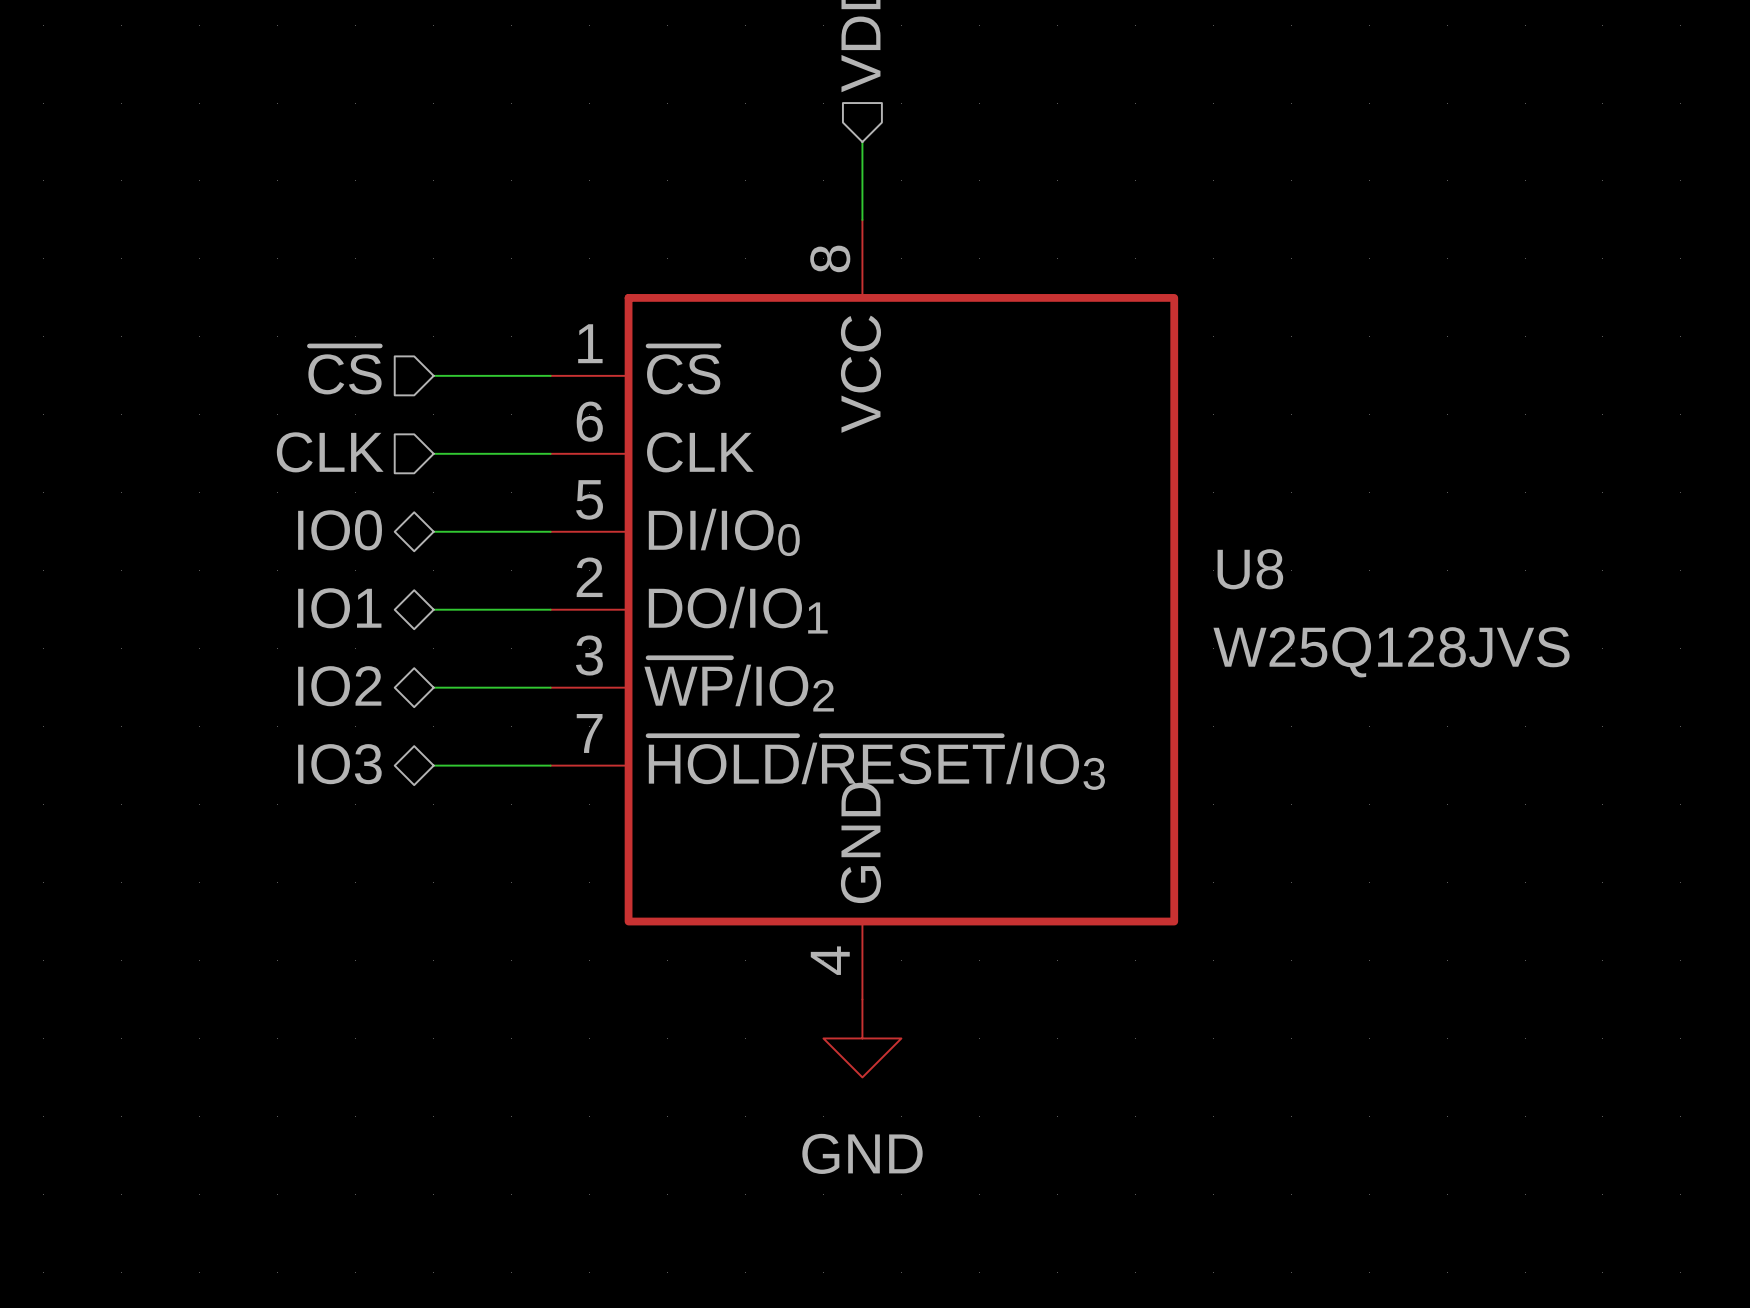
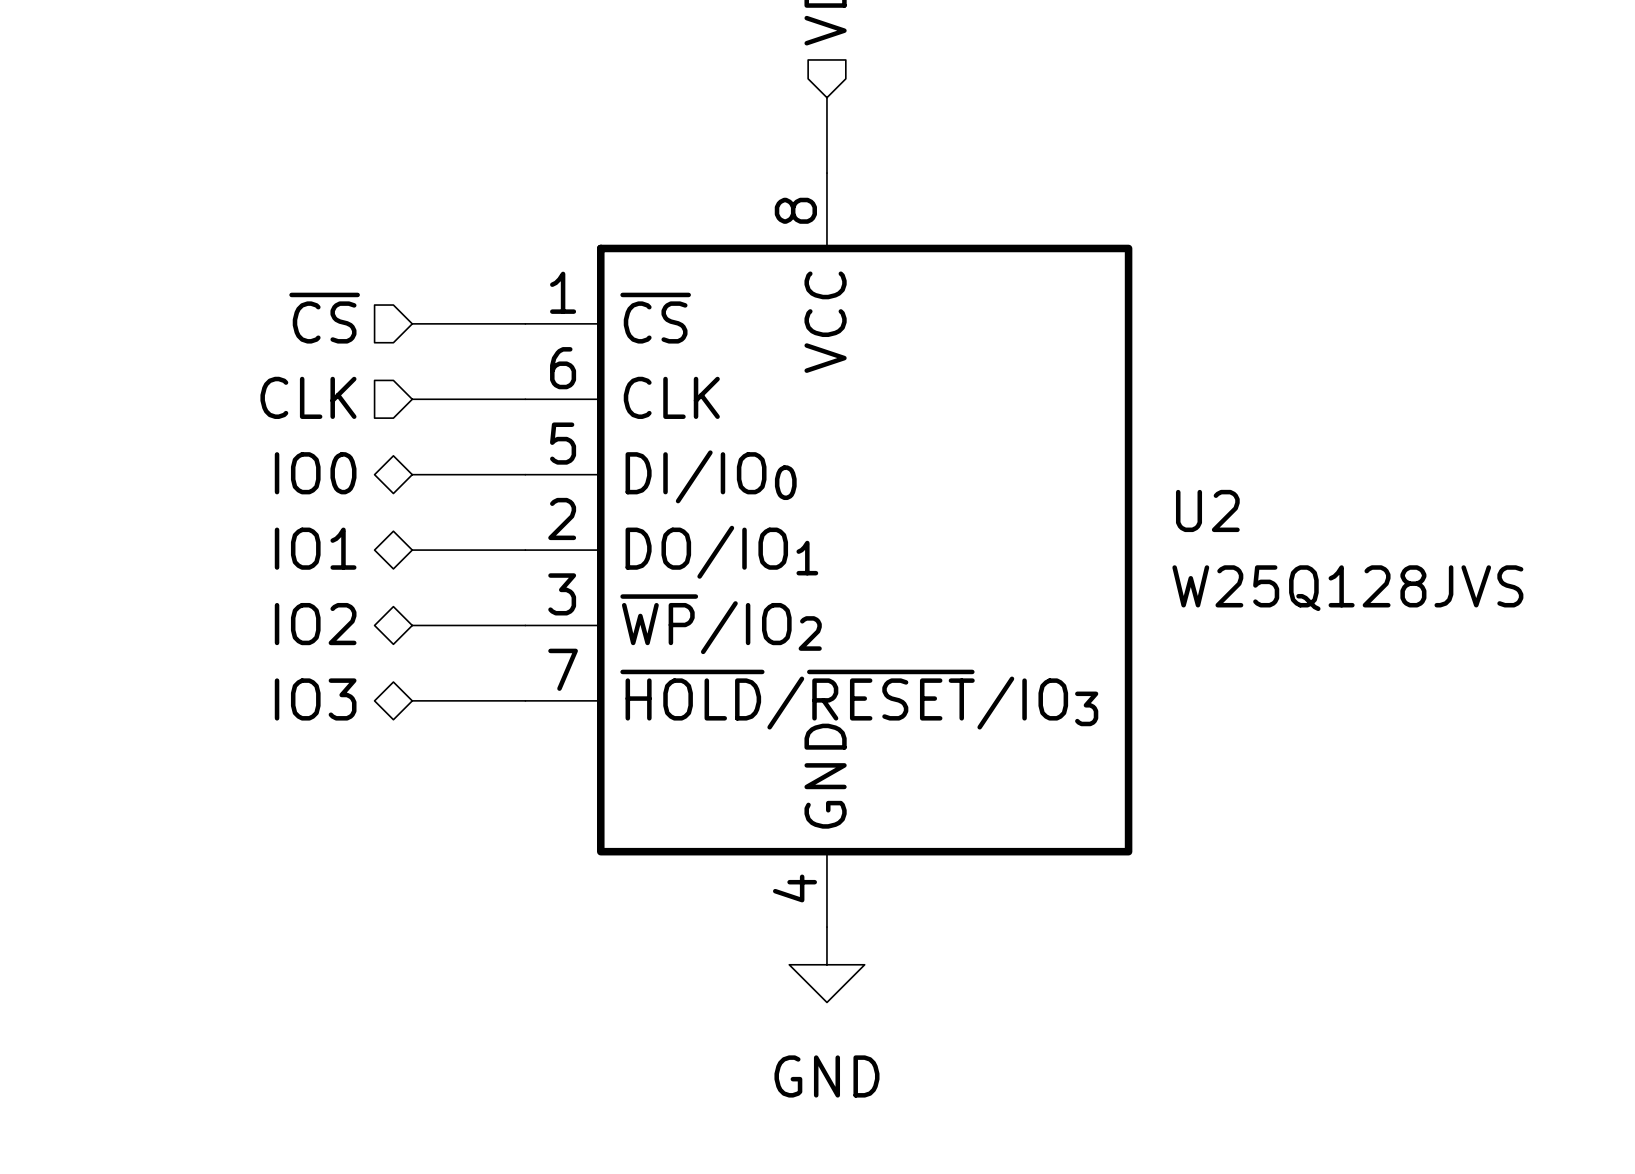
U8 name: U8 (1250, 569) -> U2 (1207, 510)

